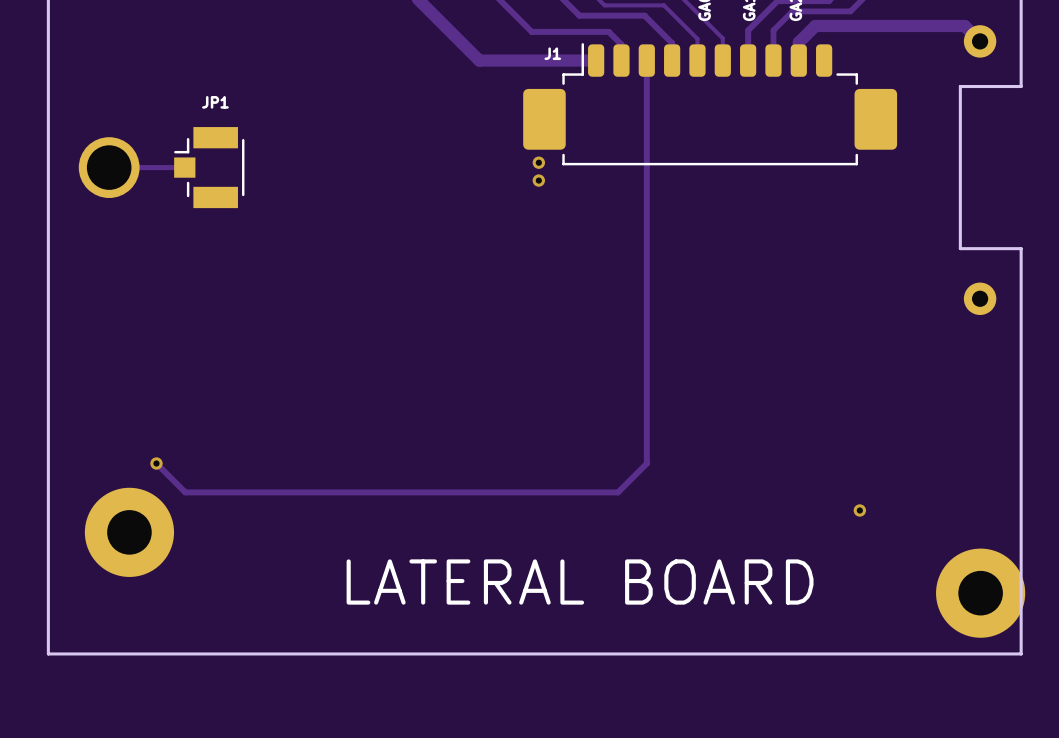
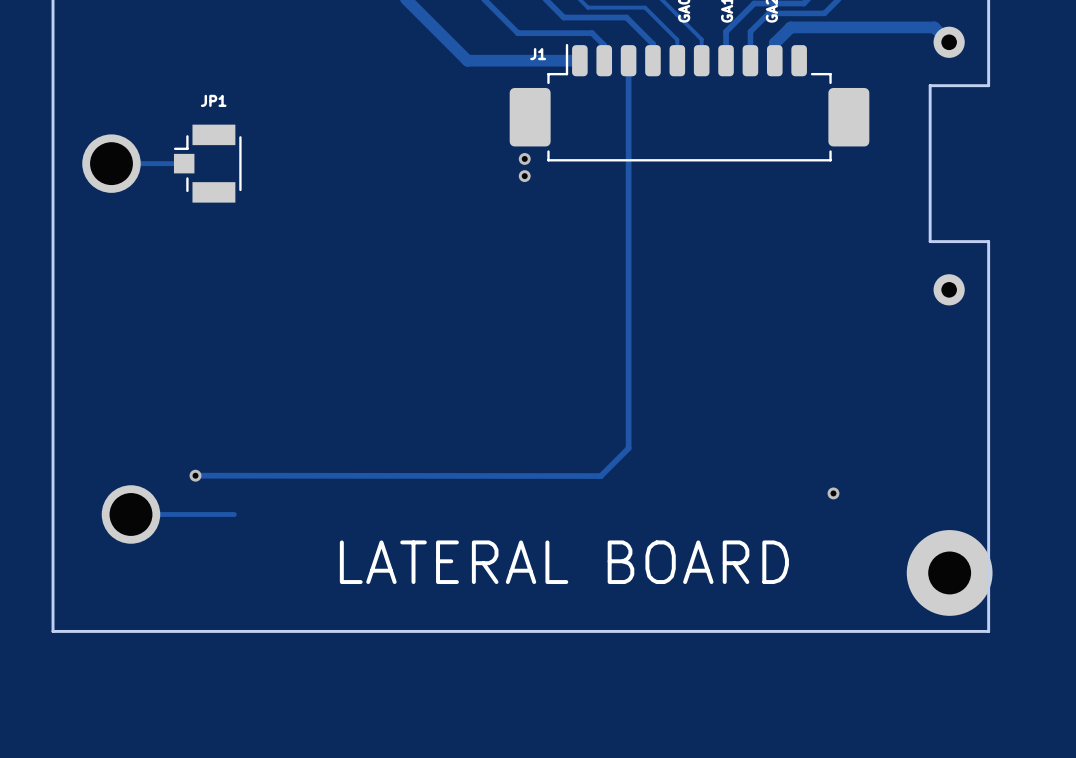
track: (156, 463) (185, 492) (618, 492) -> (195, 475) (600, 476)
via position: (156, 463) -> (195, 475)
part footprint: [84, 487, 175, 577] -> [101, 485, 161, 544]
track: none -> (130, 514) (234, 514)

